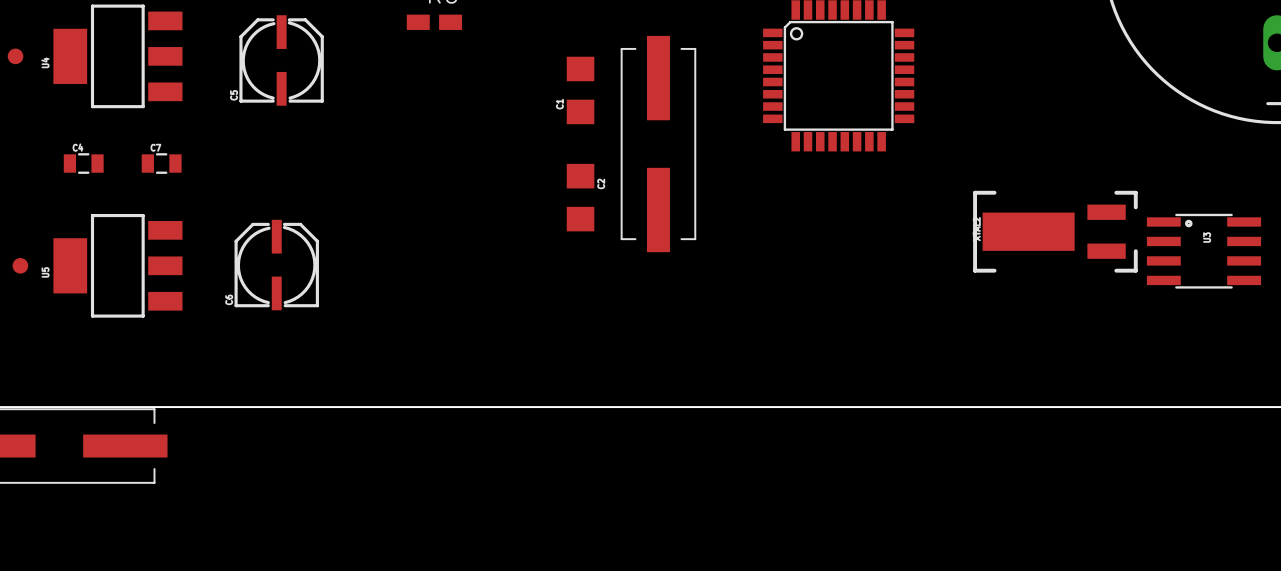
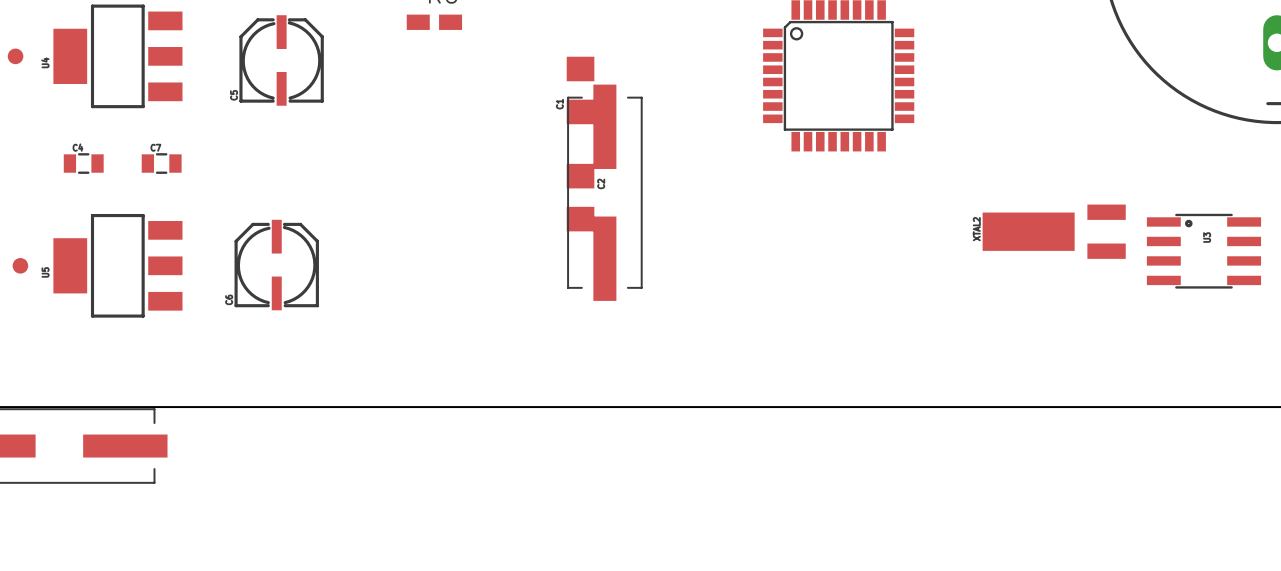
part position: (658, 144) -> (604, 192)
line: (994, 192) (975, 192) (975, 270) (994, 270) -> none
line: (1116, 192) (1135, 192) (1135, 207) -> none
line: (1135, 251) (1135, 270) (1116, 270) -> none

